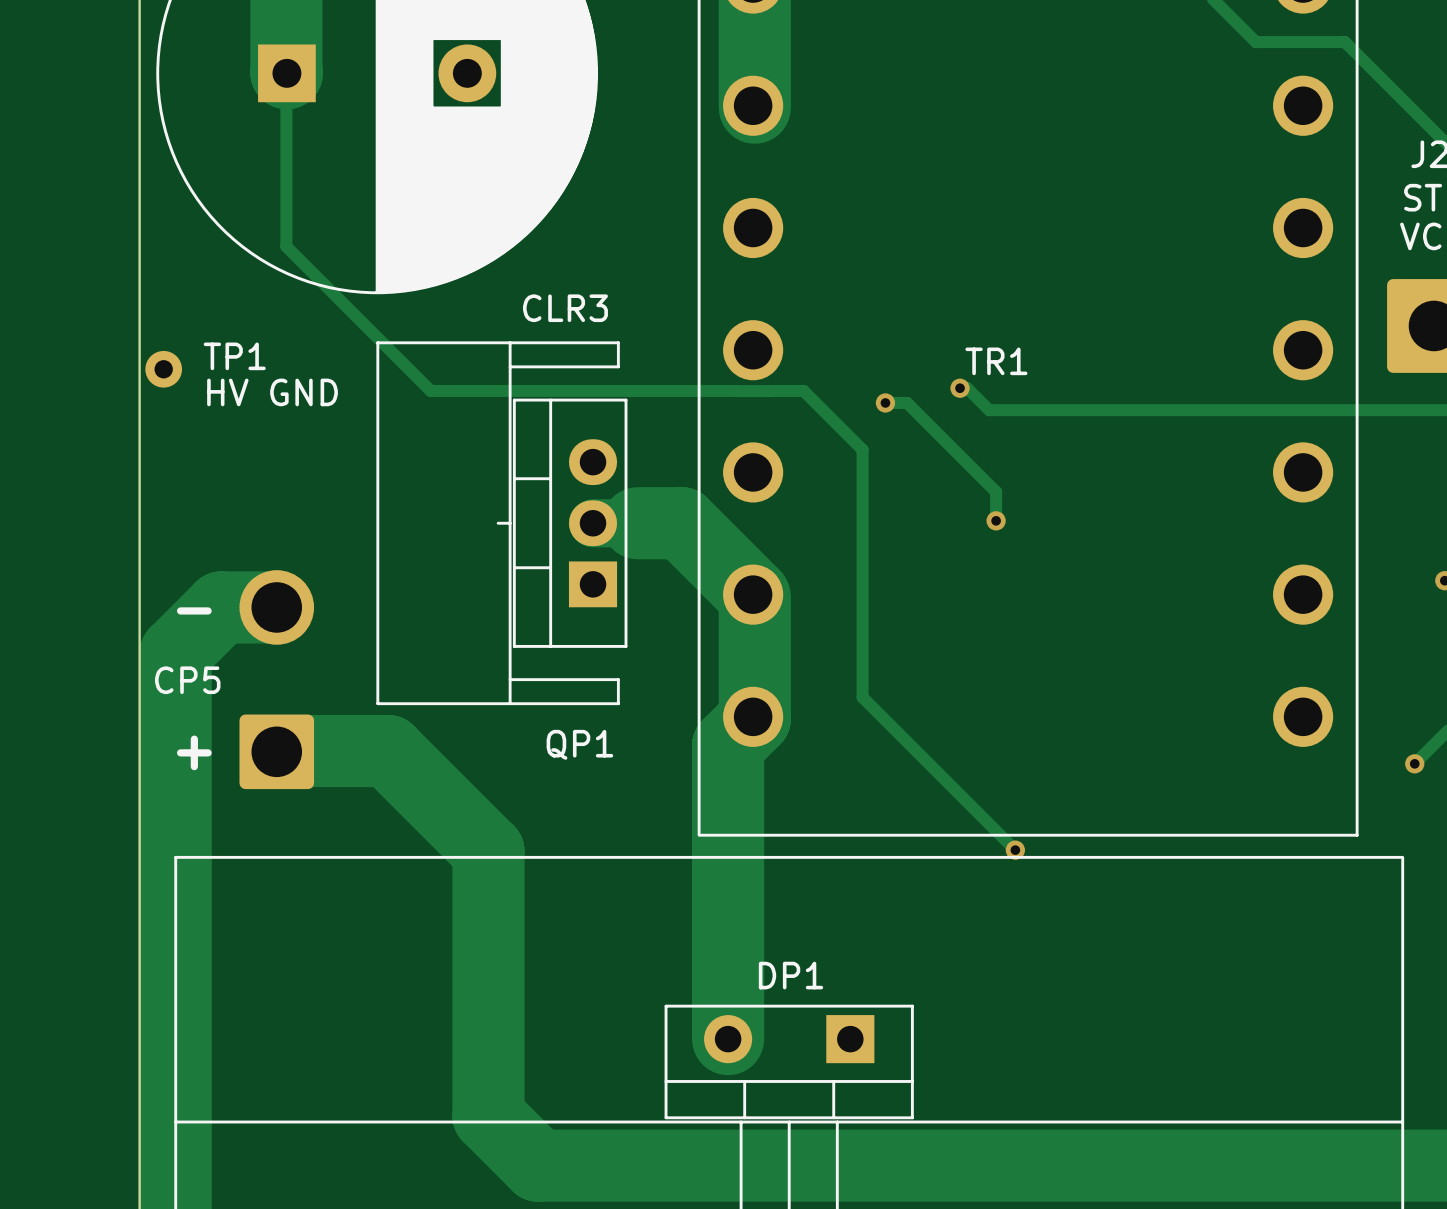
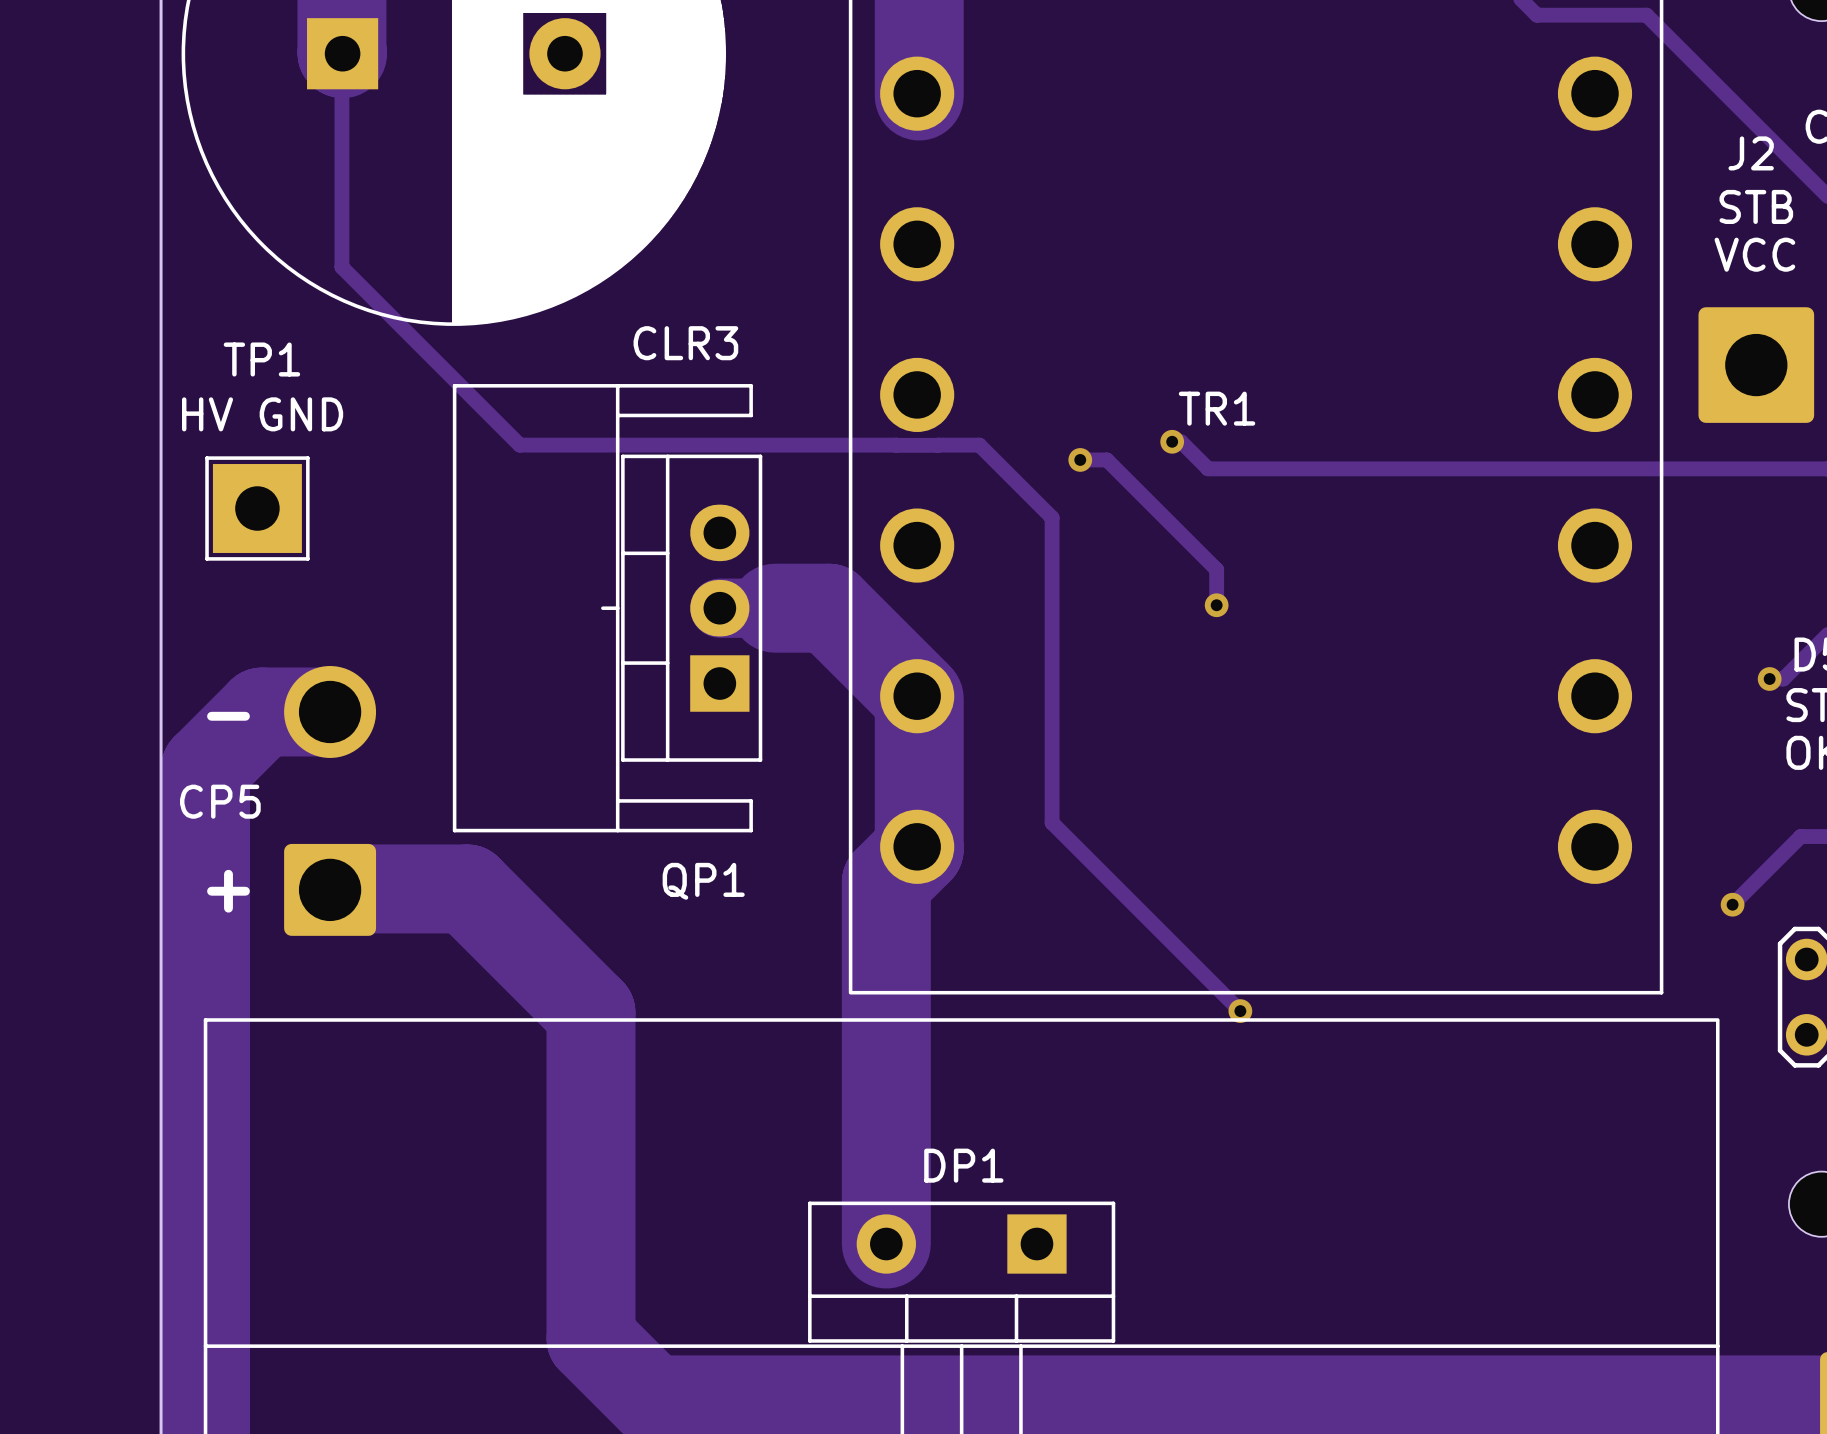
TP1 footprint: [145, 350, 183, 388] -> [205, 456, 310, 561]
TP1 name position: TP1 (234, 356) -> TP1 (261, 359)
TP1 value position: HV GND (272, 392) -> HV GND (262, 414)

